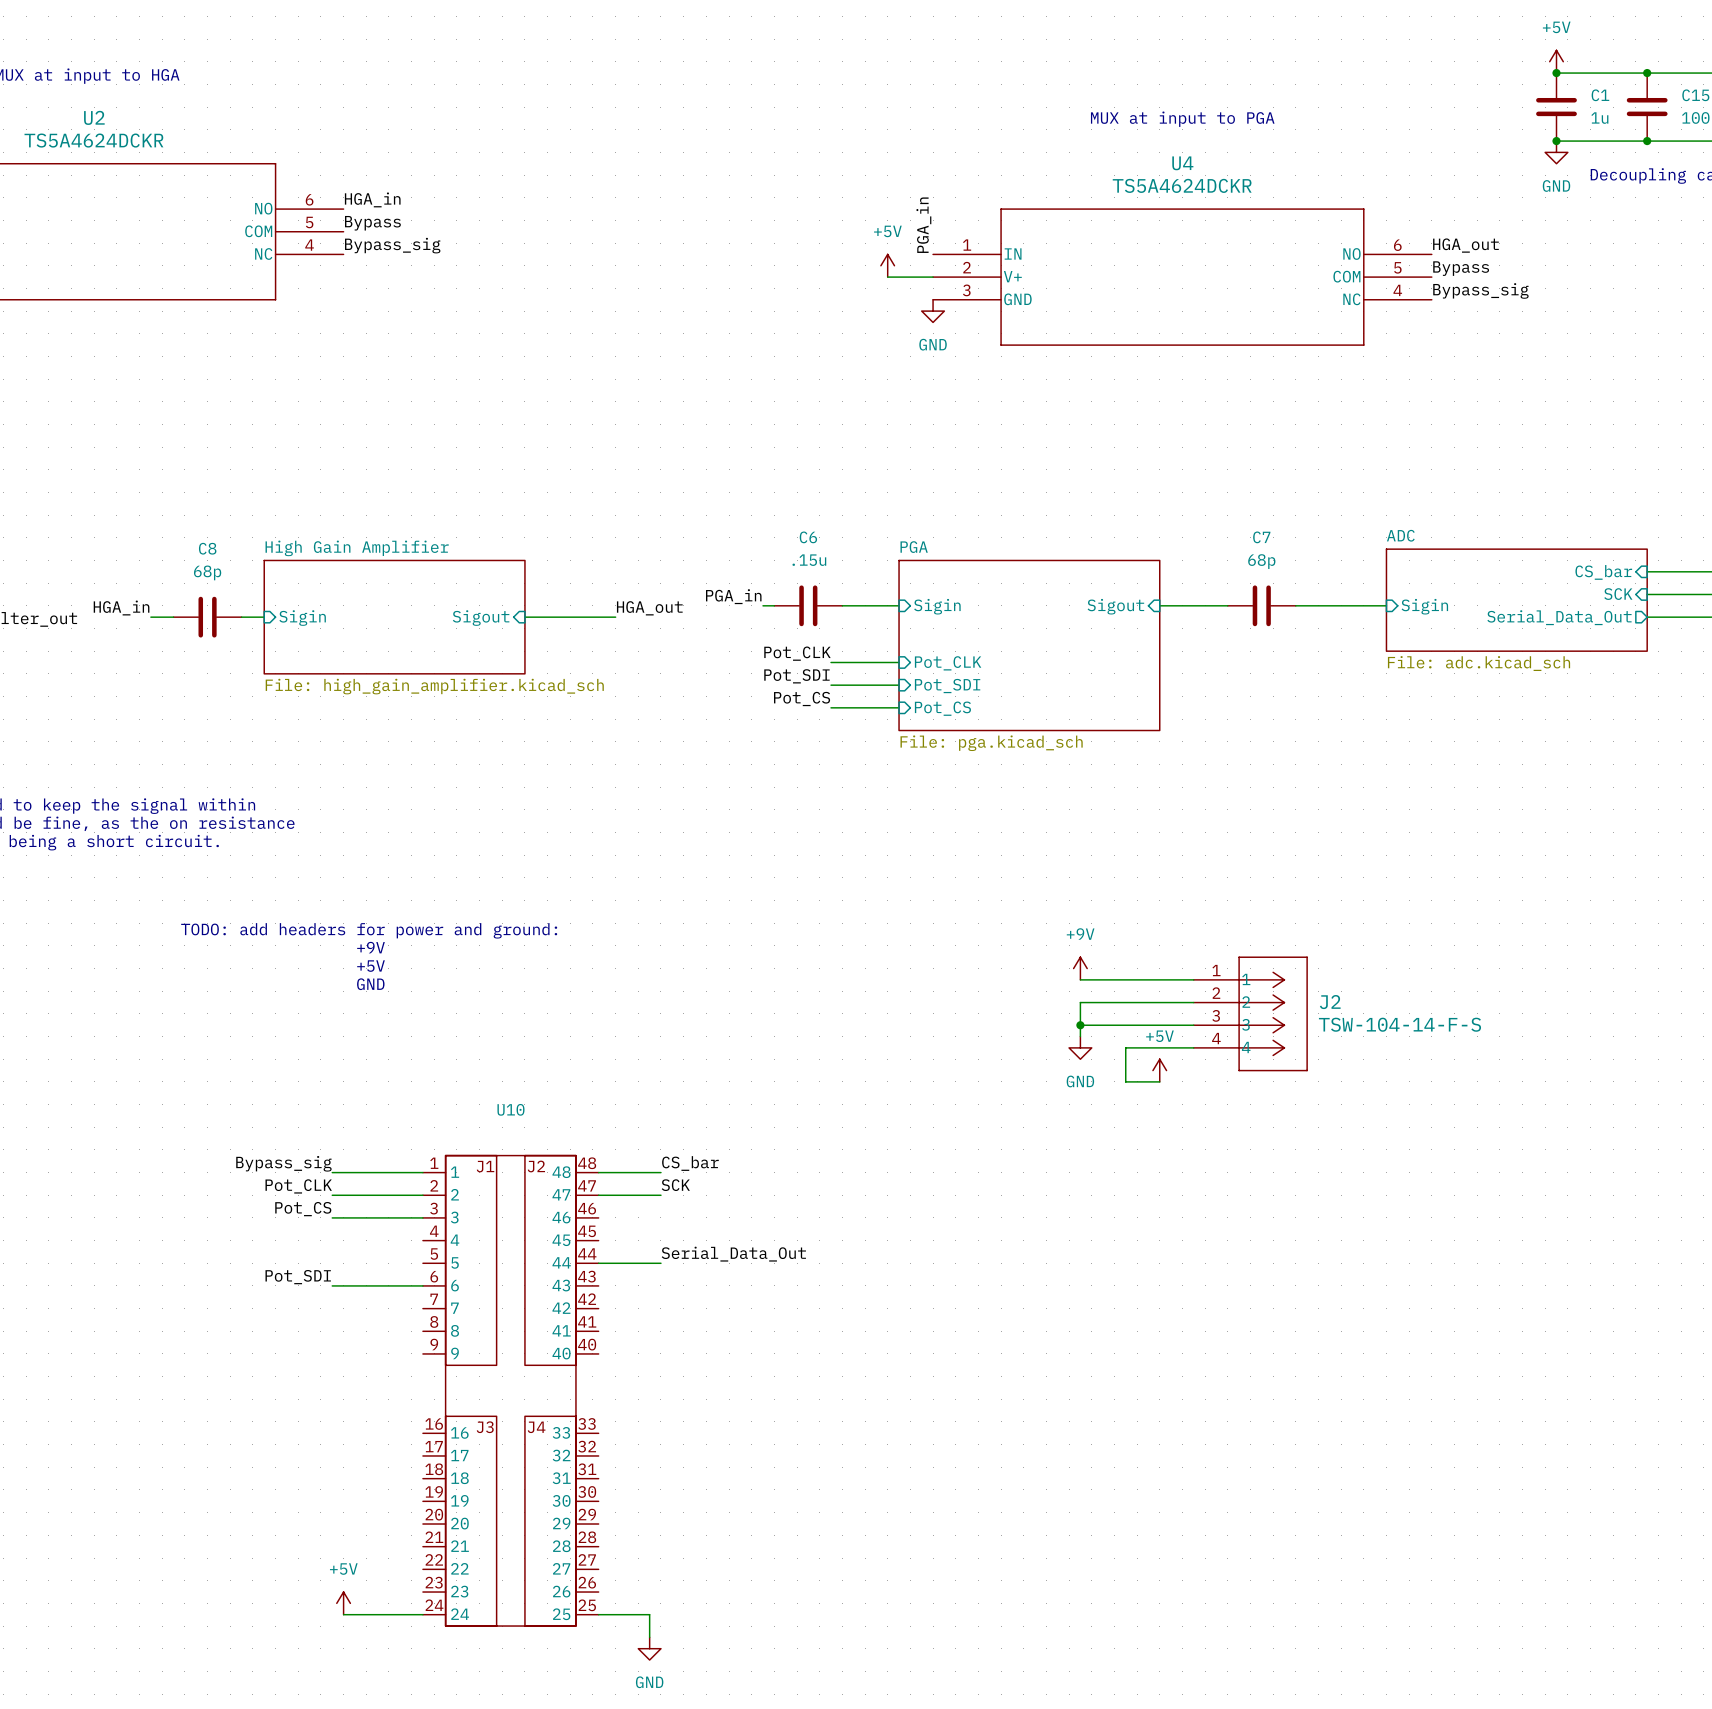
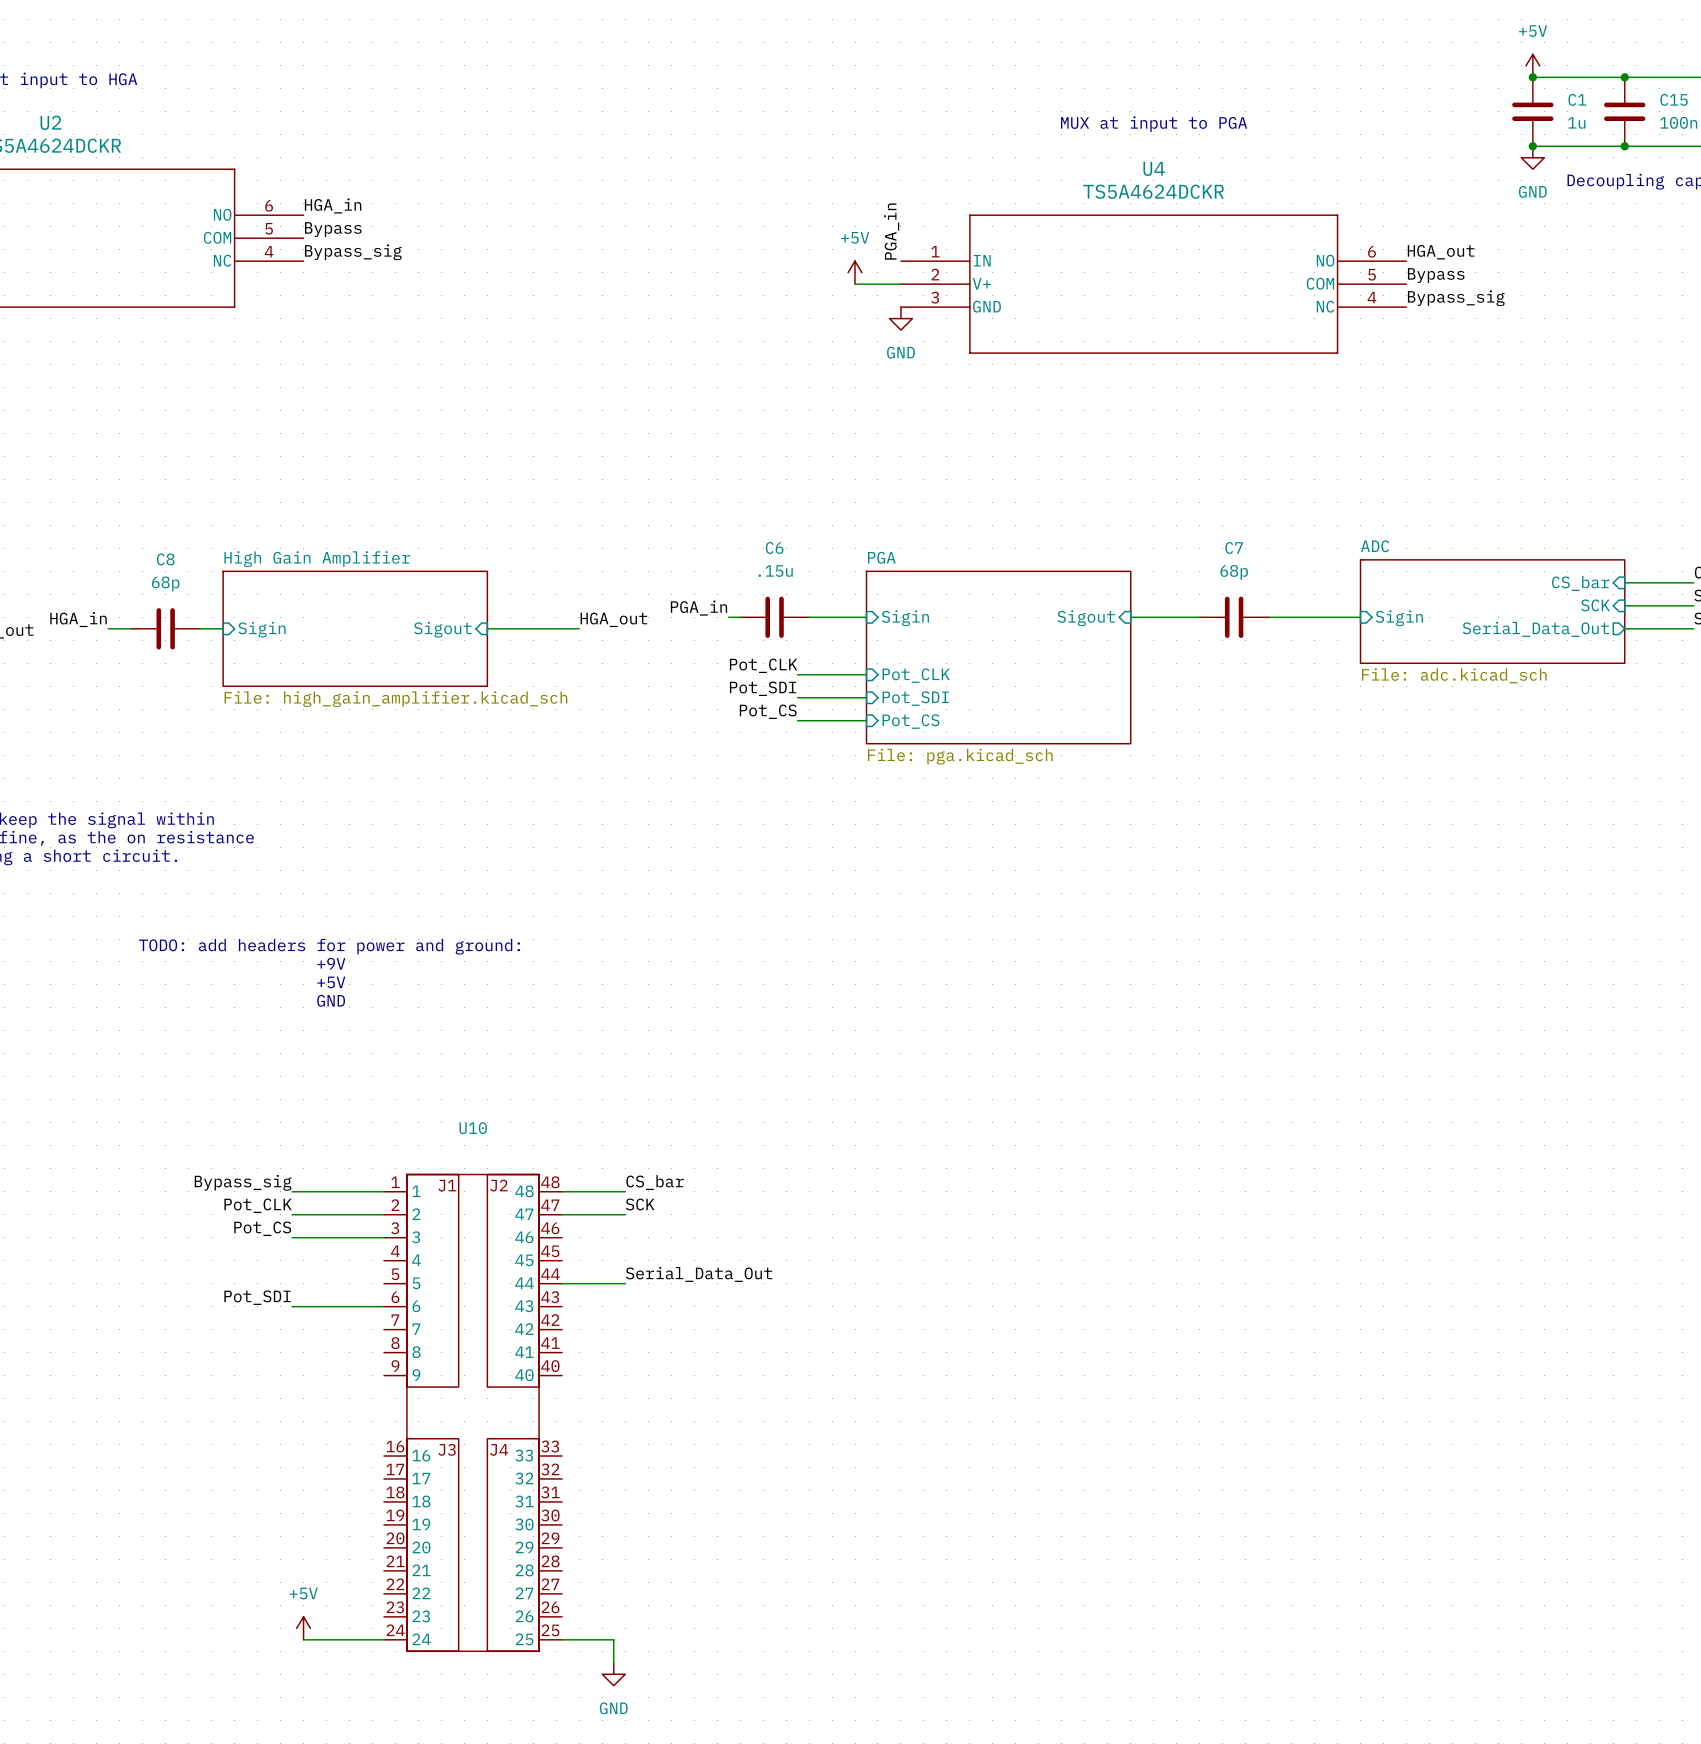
power symbol: +9V (1080, 968) -> none
wire: (1080, 979) (1193, 979) -> none
wire: (1193, 1002) (1080, 1002) (1080, 1036) -> none
J2: TSW-104-14-F-S (1250, 1013) -> none
wire: (1080, 1025) (1193, 1025) -> none
junction: (1080, 1025) -> none
power symbol: GND (1080, 1047) -> none
wire: (1193, 1047) (1125, 1047) (1125, 1081) (1159, 1081) -> none
power symbol: +5V (1159, 1070) -> none

